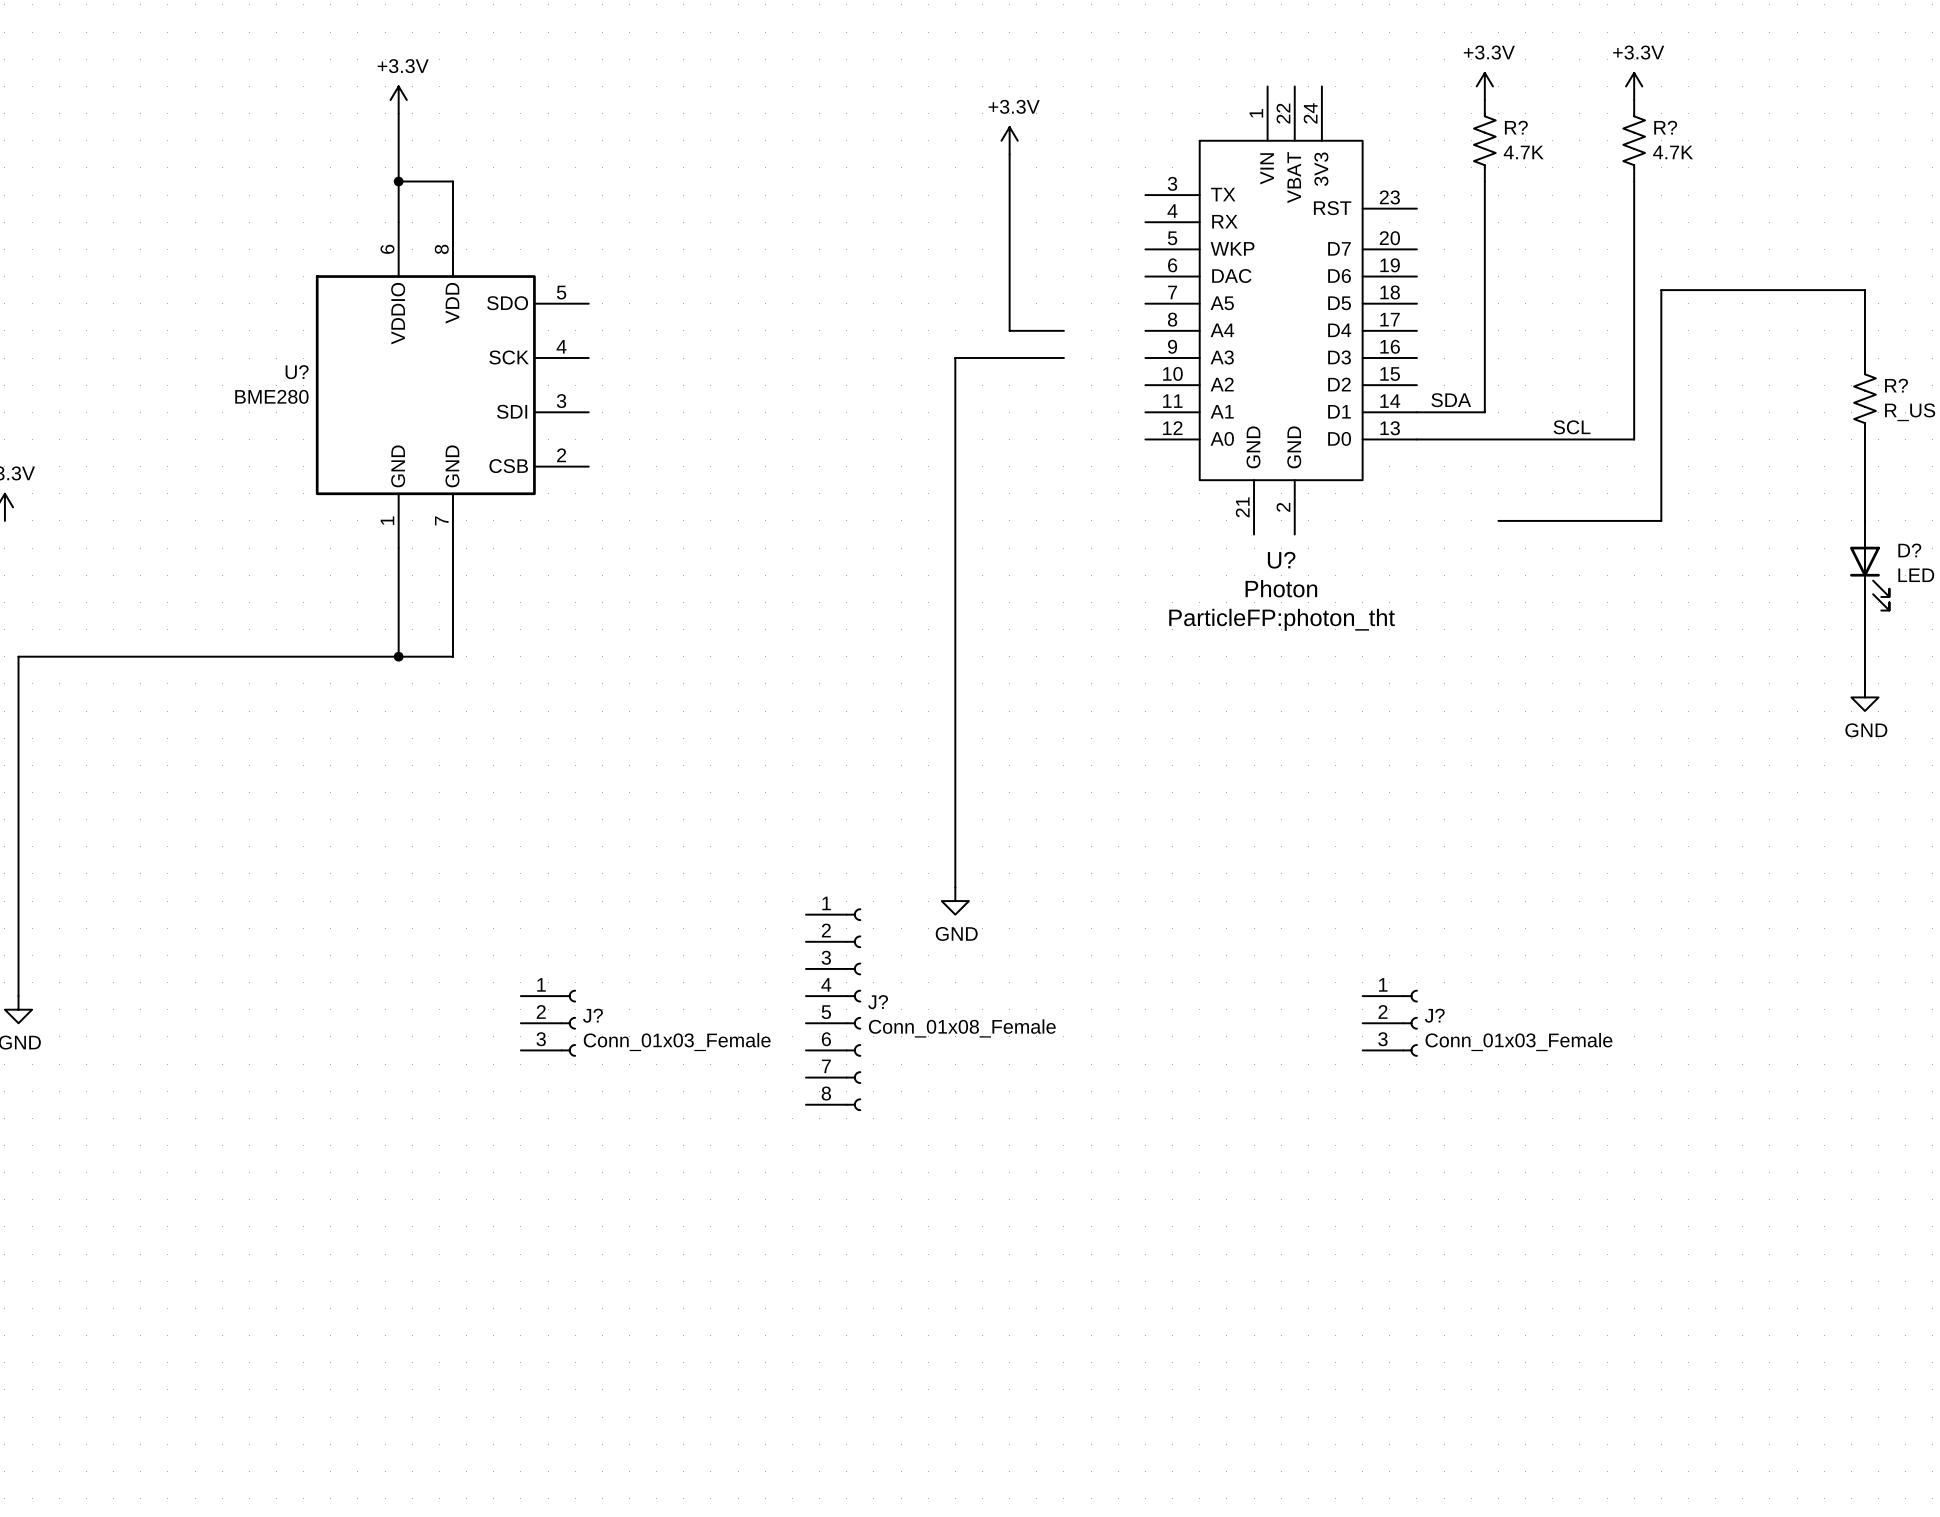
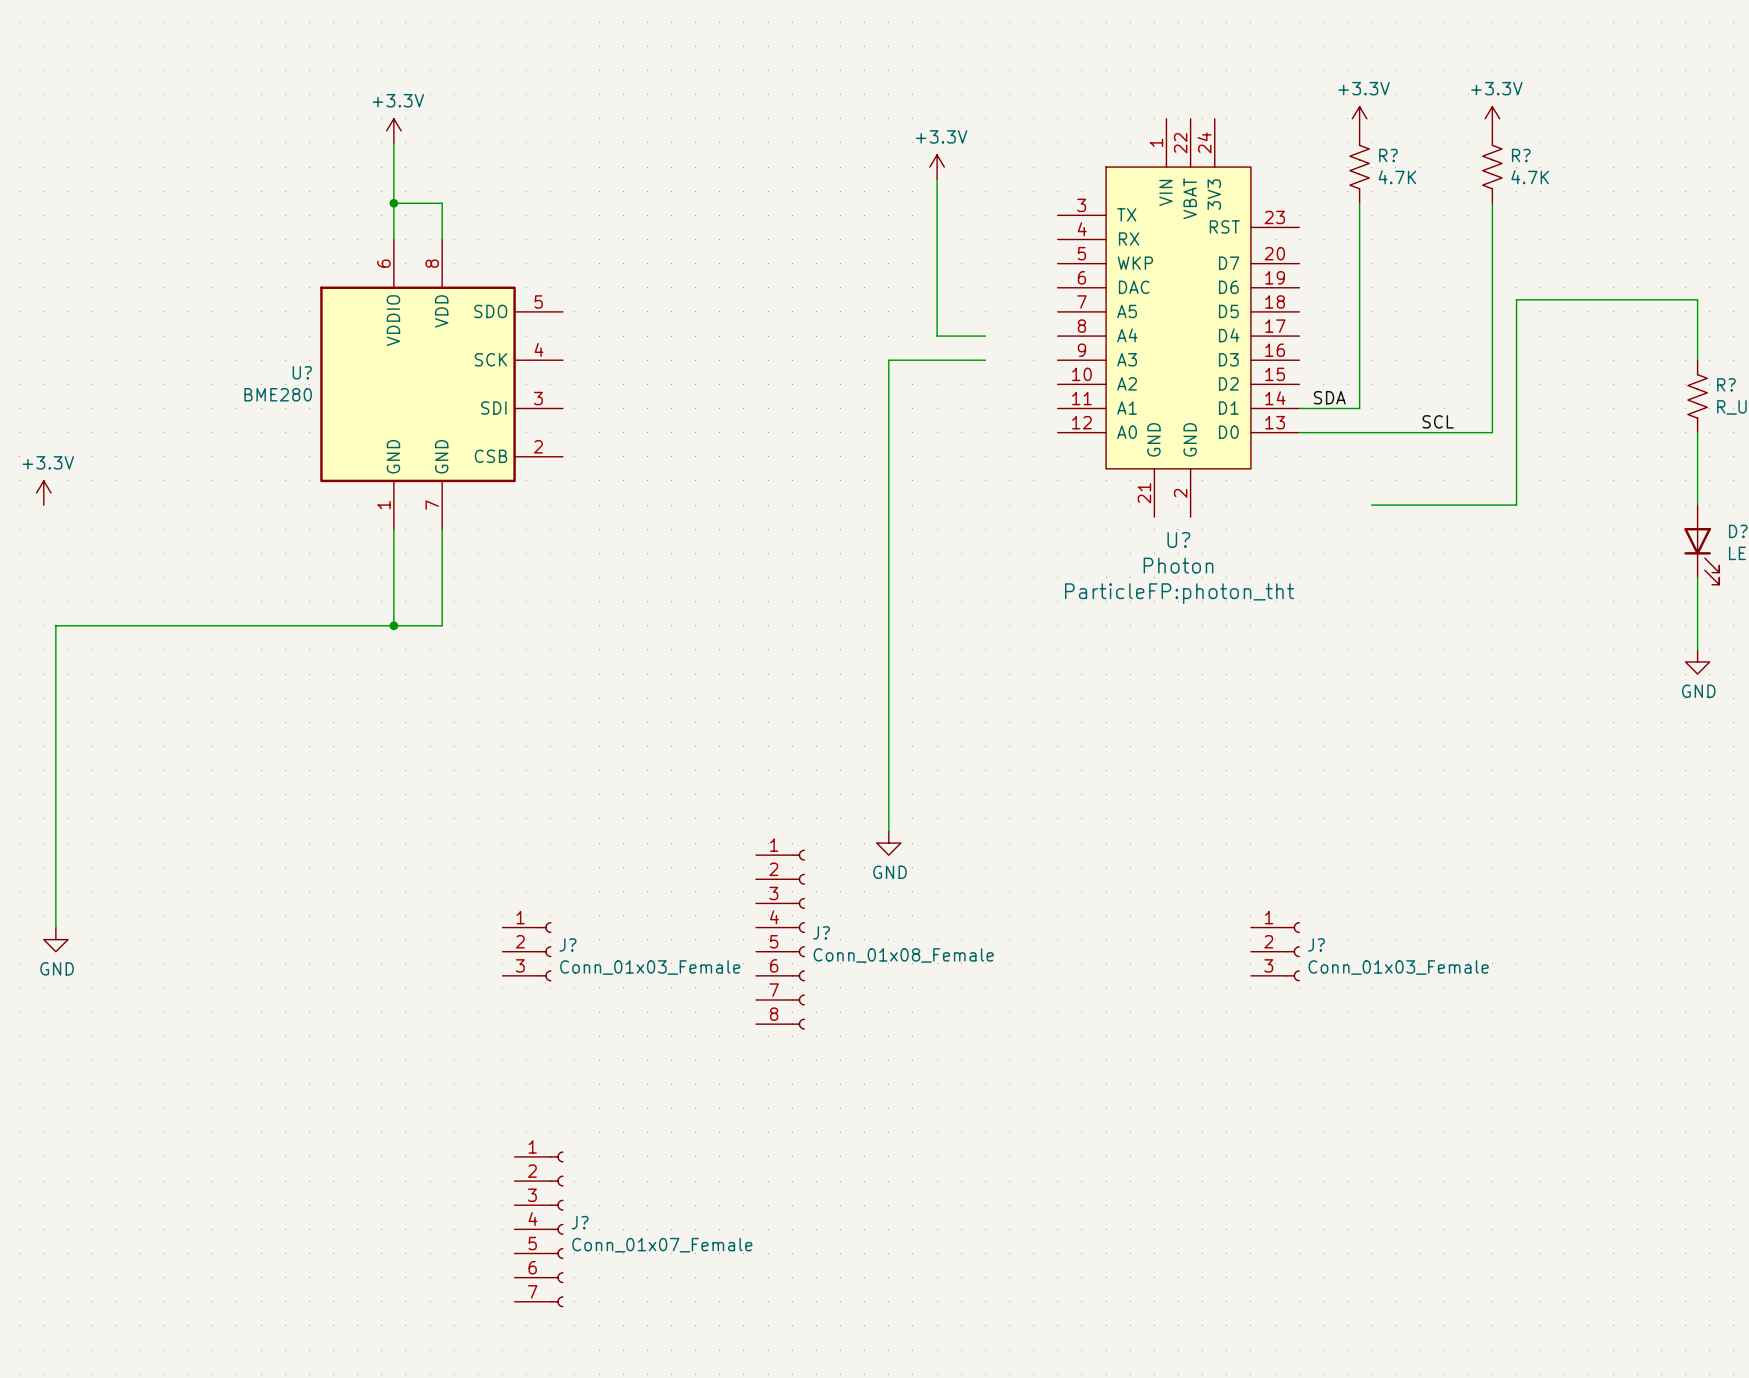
J?: none -> Conn_01x07_Female (539, 1229)

